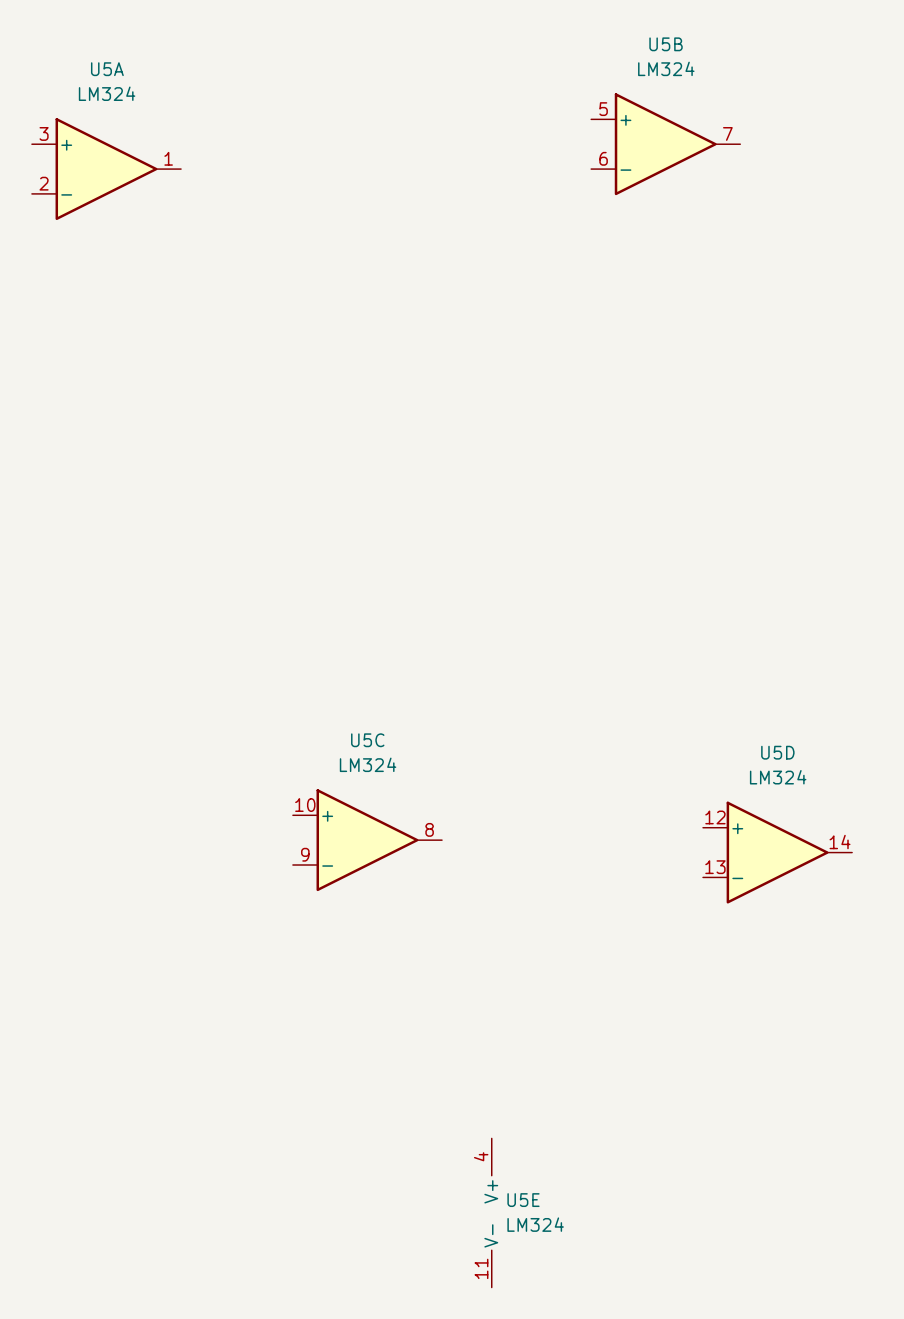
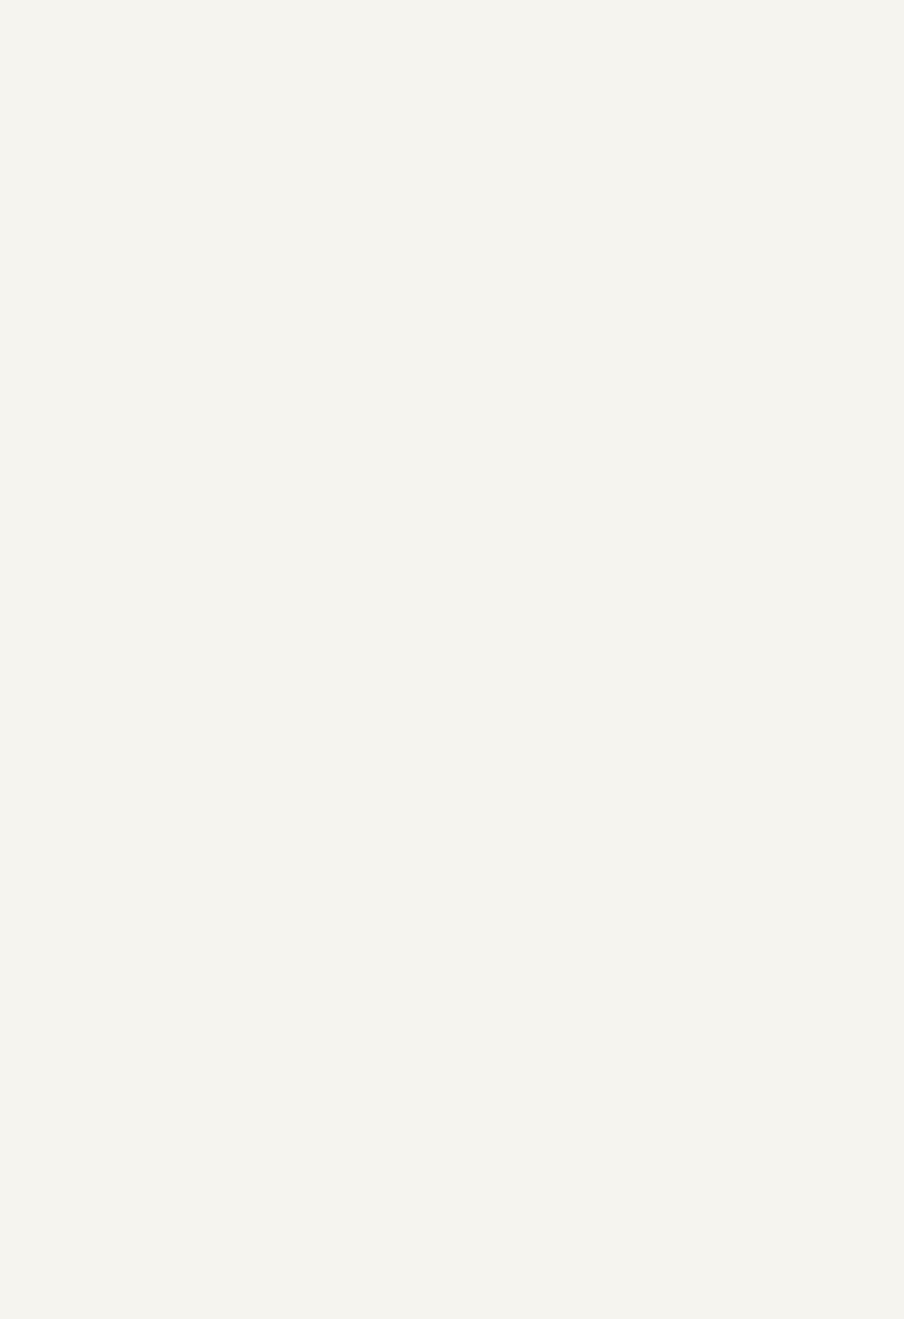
U5B: LM324 (665, 144) -> none
U5A: LM324 (106, 169) -> none
U5C: LM324 (367, 840) -> none
U5D: LM324 (777, 852) -> none
U5E: LM324 (491, 1212) -> none

